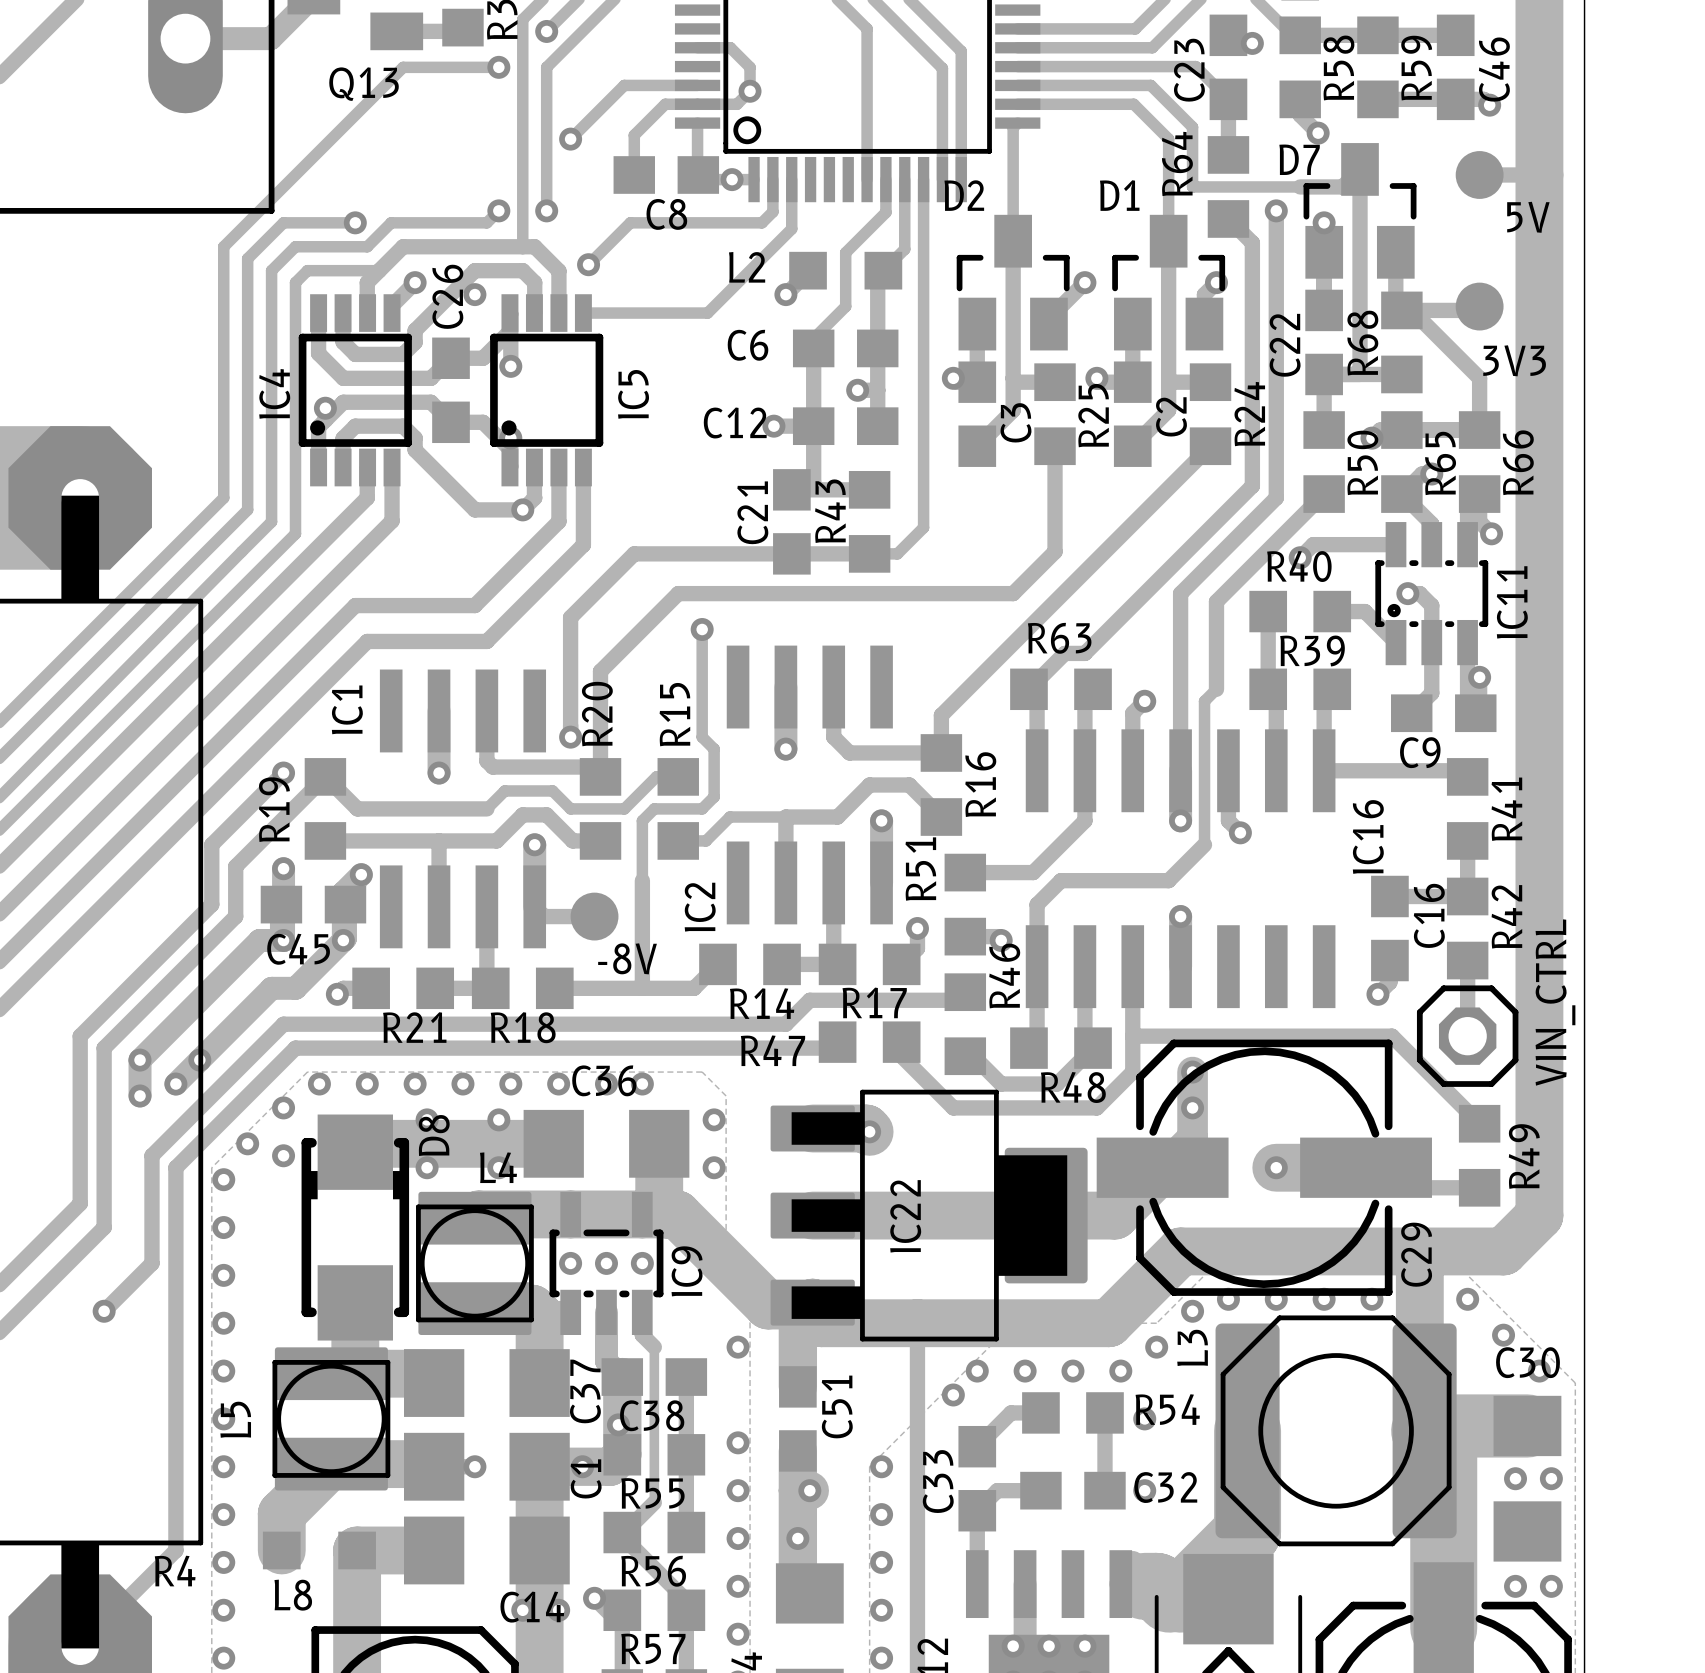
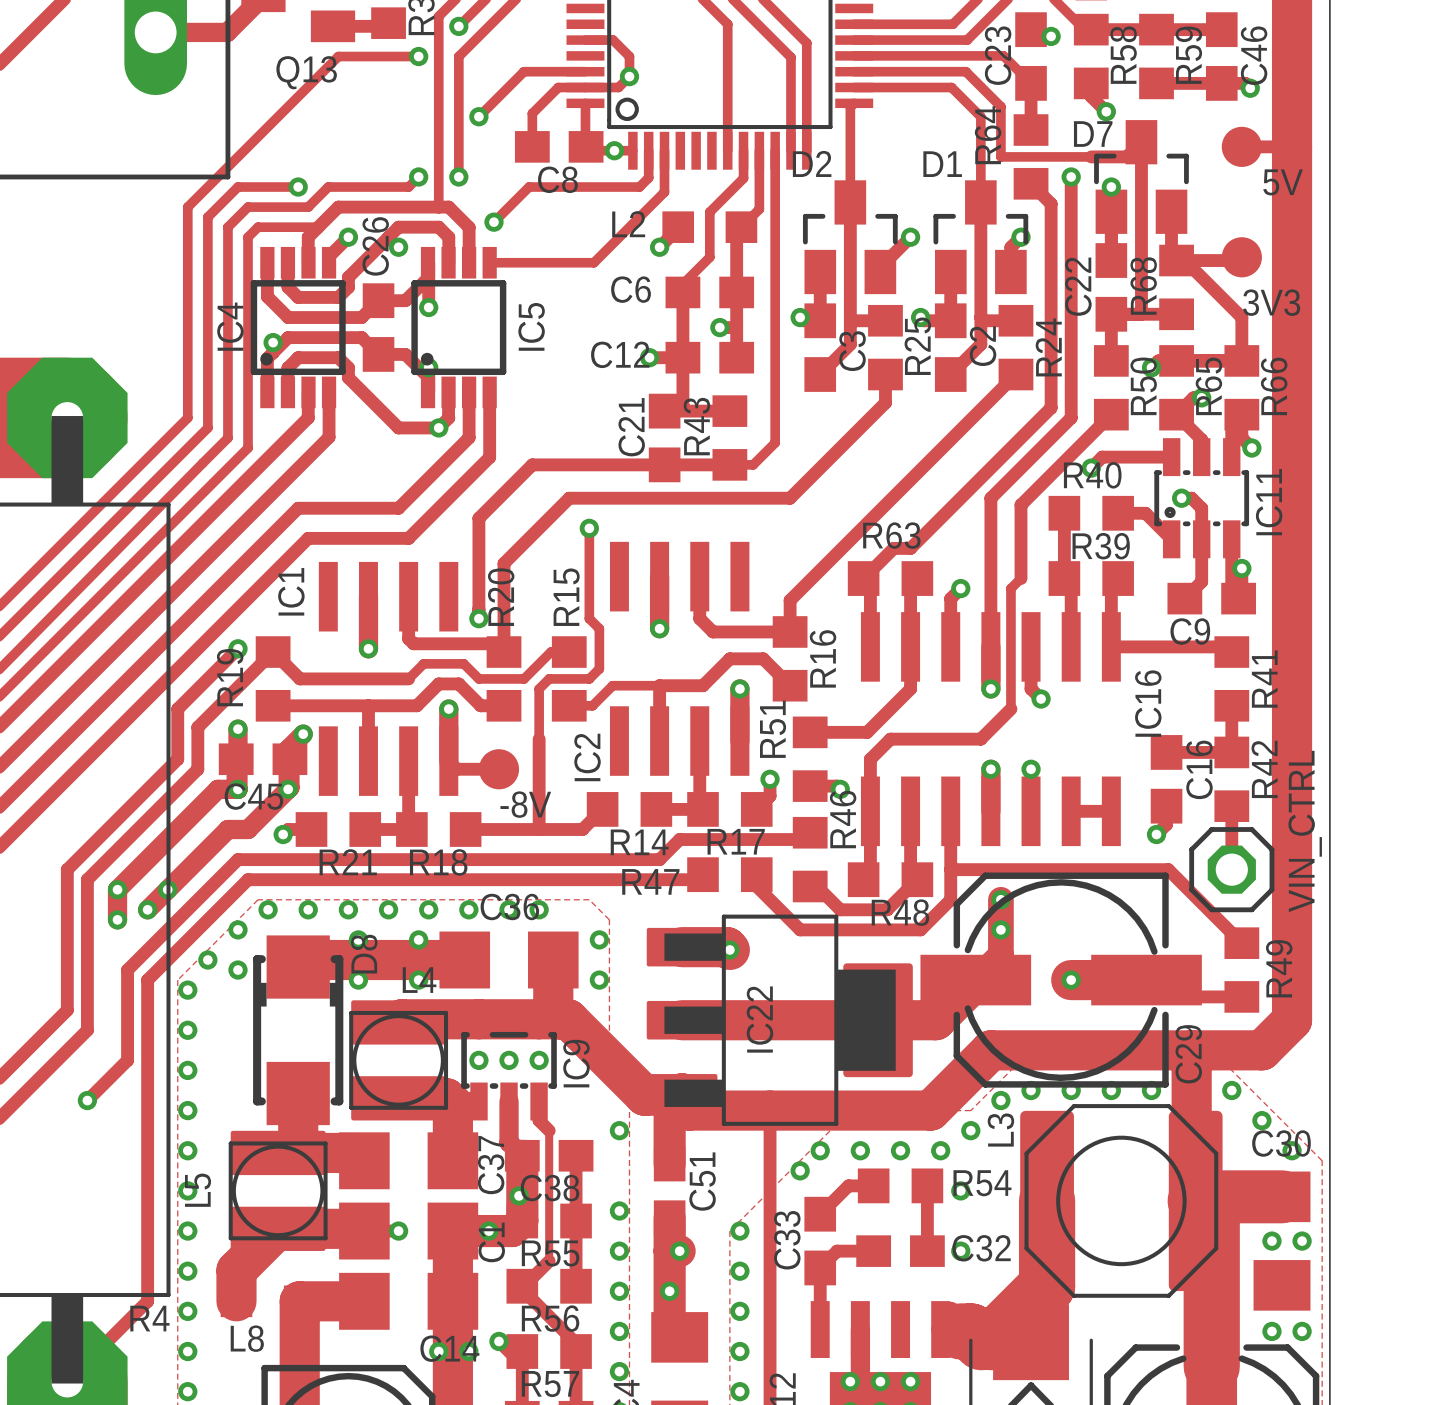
track: (1055, 479) (1055, 551) (1013, 593) (941, 593) -> (885, 402) (790, 498)
via: none -> (1031, 769)
track: none -> (1071, 811) (1111, 811)

